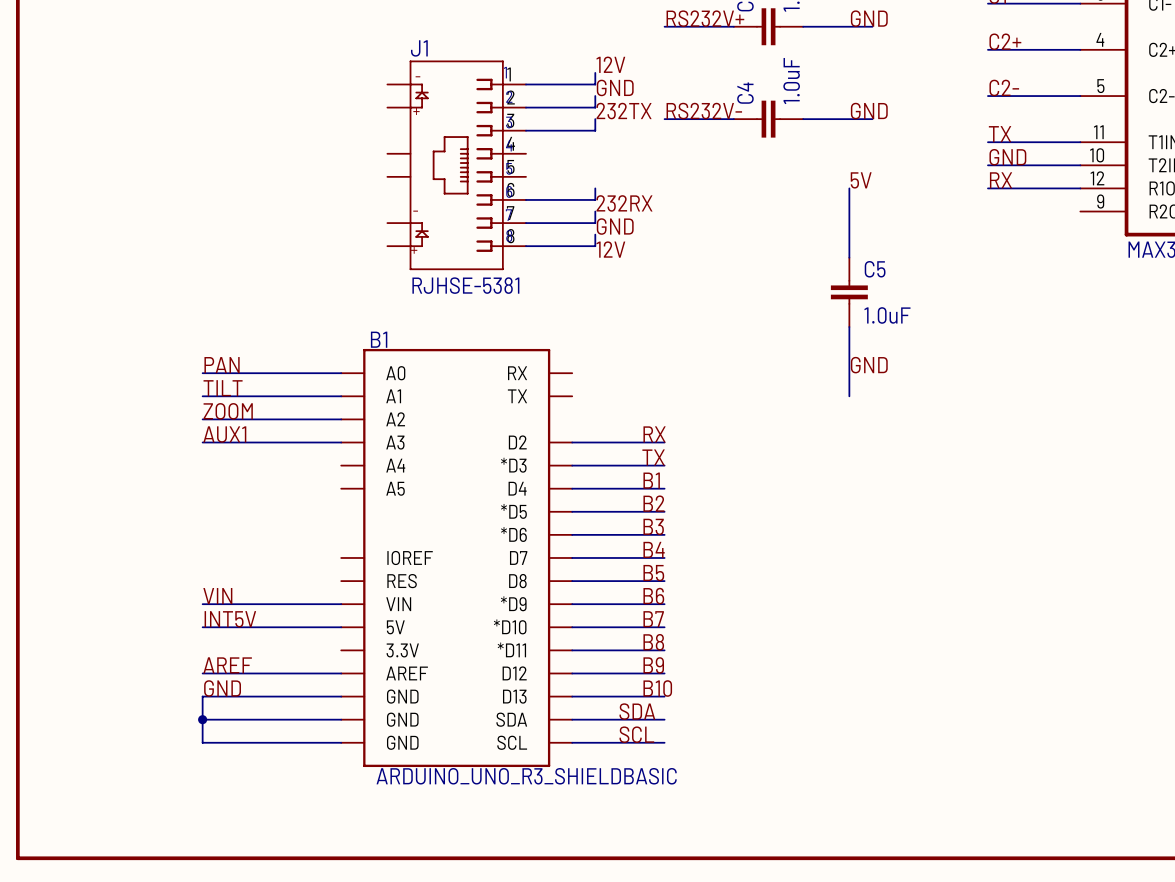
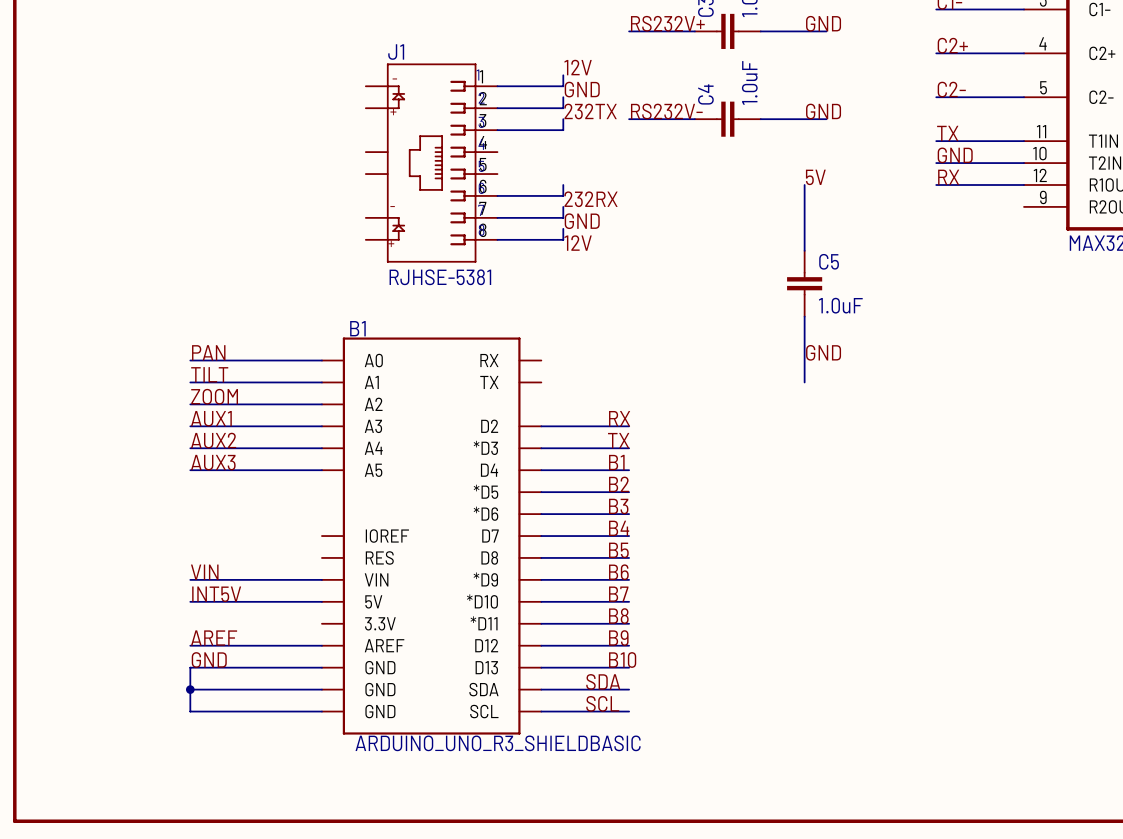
label: none -> AUX2 (213, 440)
wire: none -> (190, 448) (321, 448)
label: none -> AUX3 (213, 462)
wire: none -> (190, 470) (321, 470)

